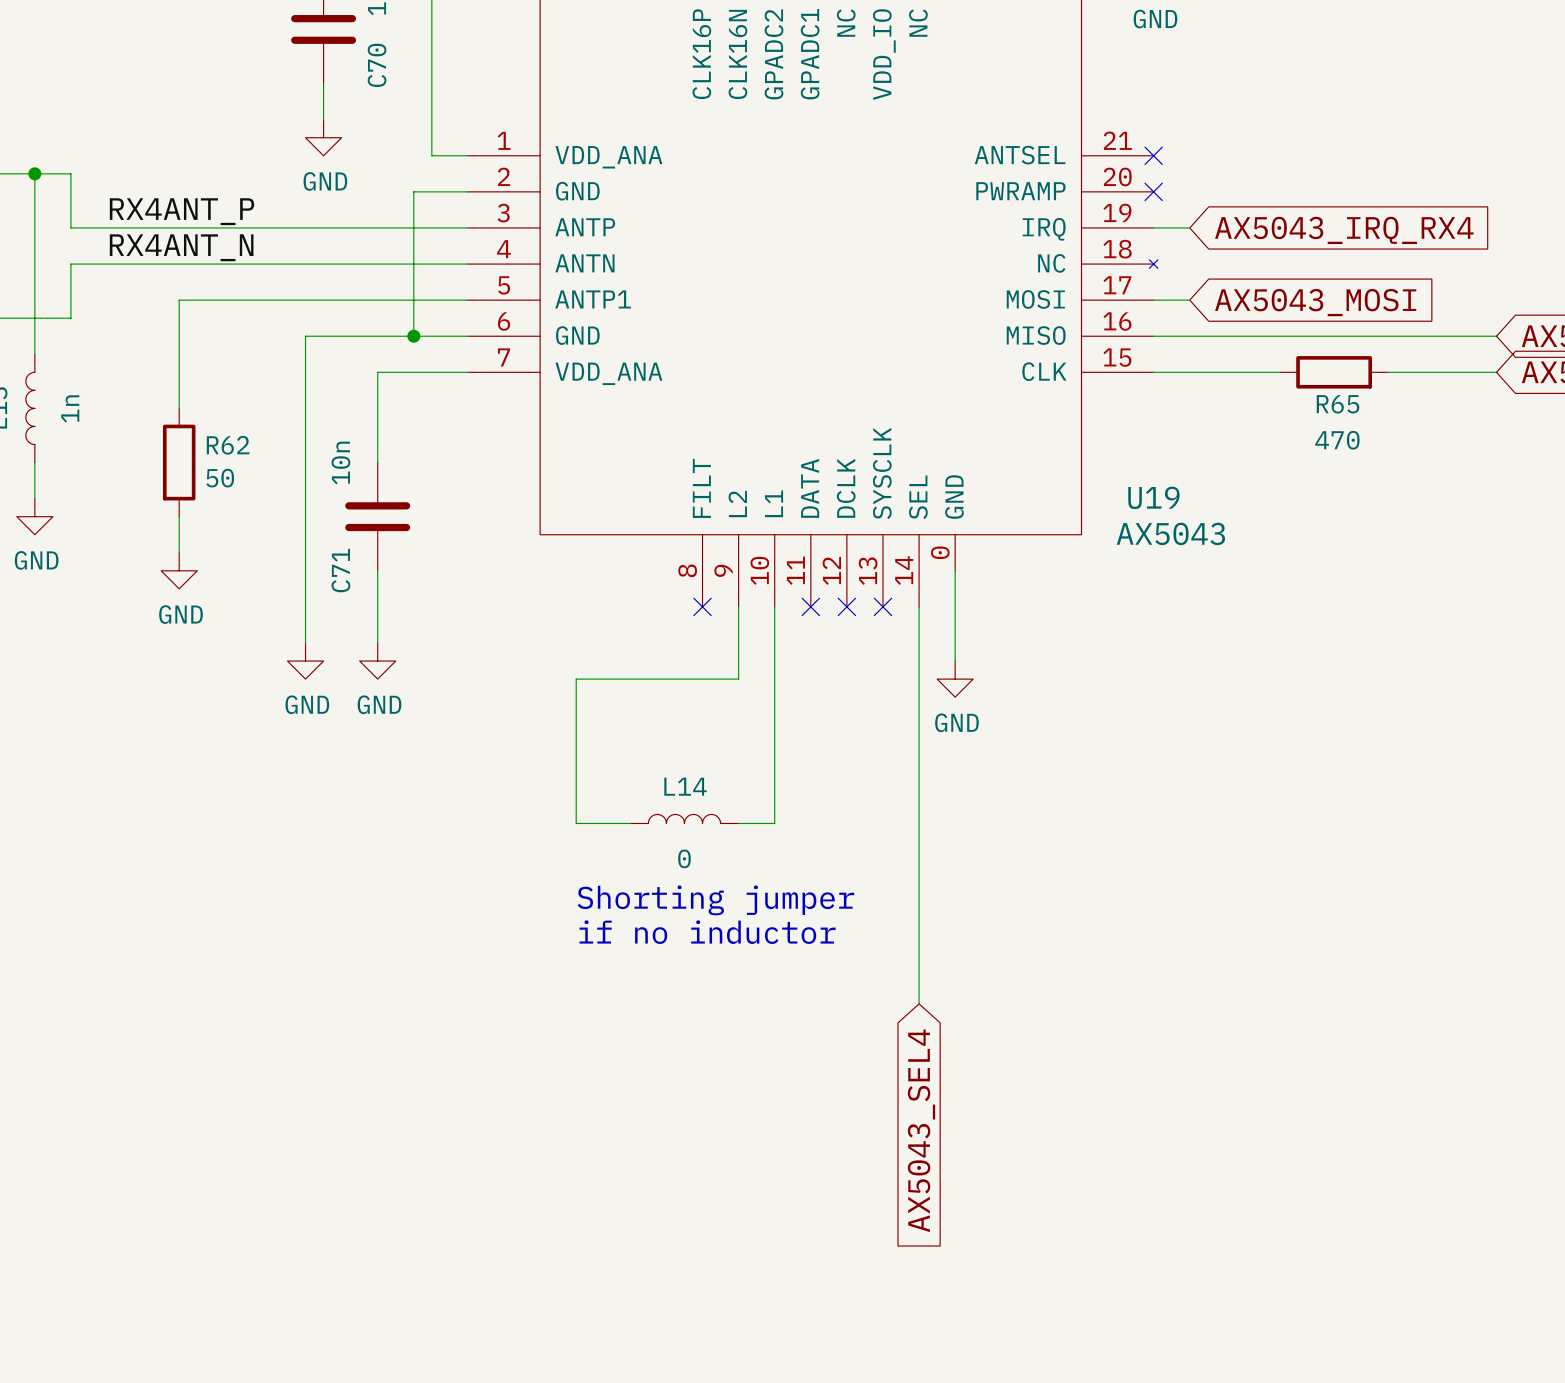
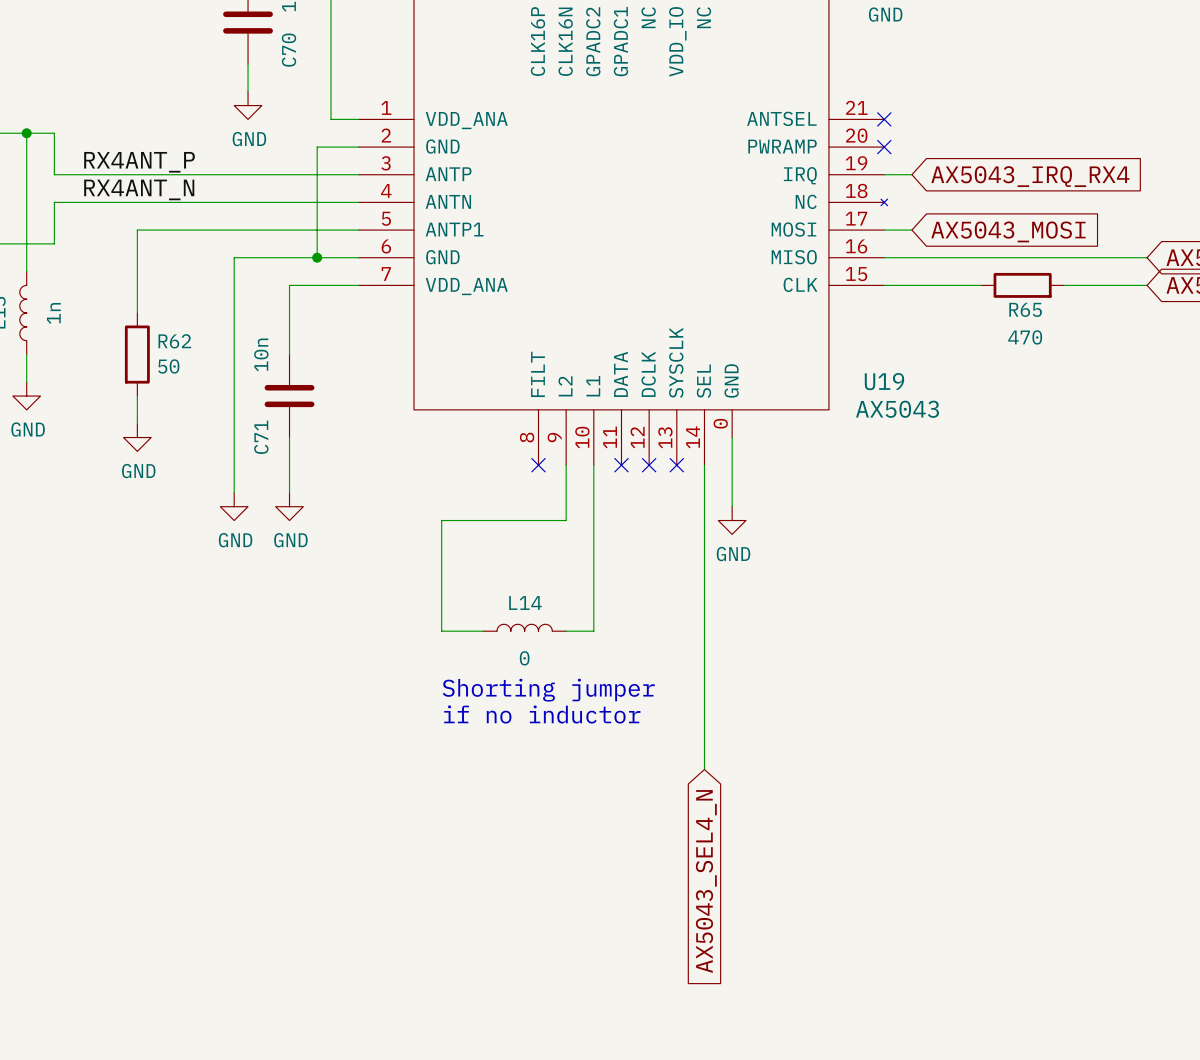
global label: AX5043_SEL4 (921, 1130) -> AX5043_SEL4_N (706, 881)

